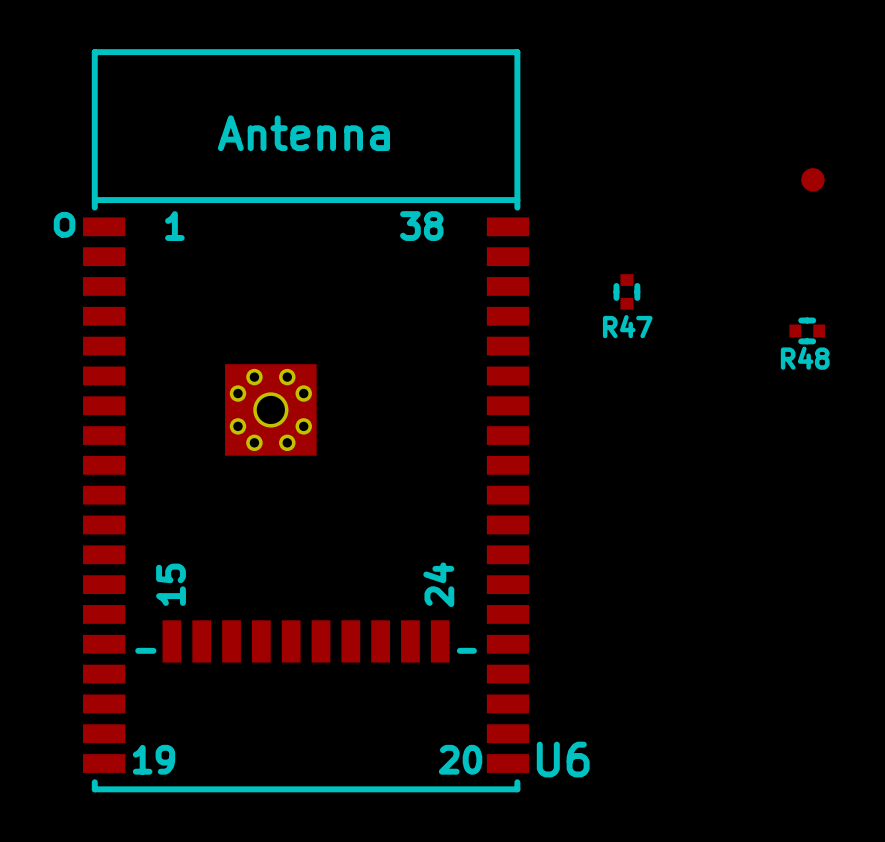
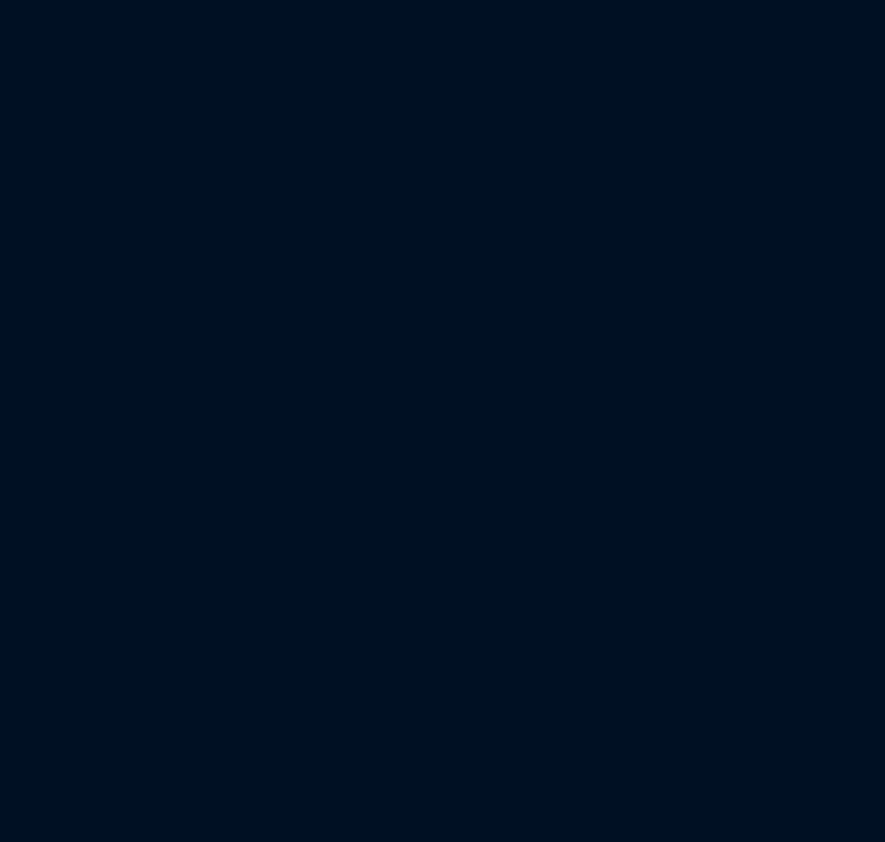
part: (812, 179) -> none
R47: (626, 291) -> none
R48: (807, 330) -> none
U6: (306, 420) -> none

